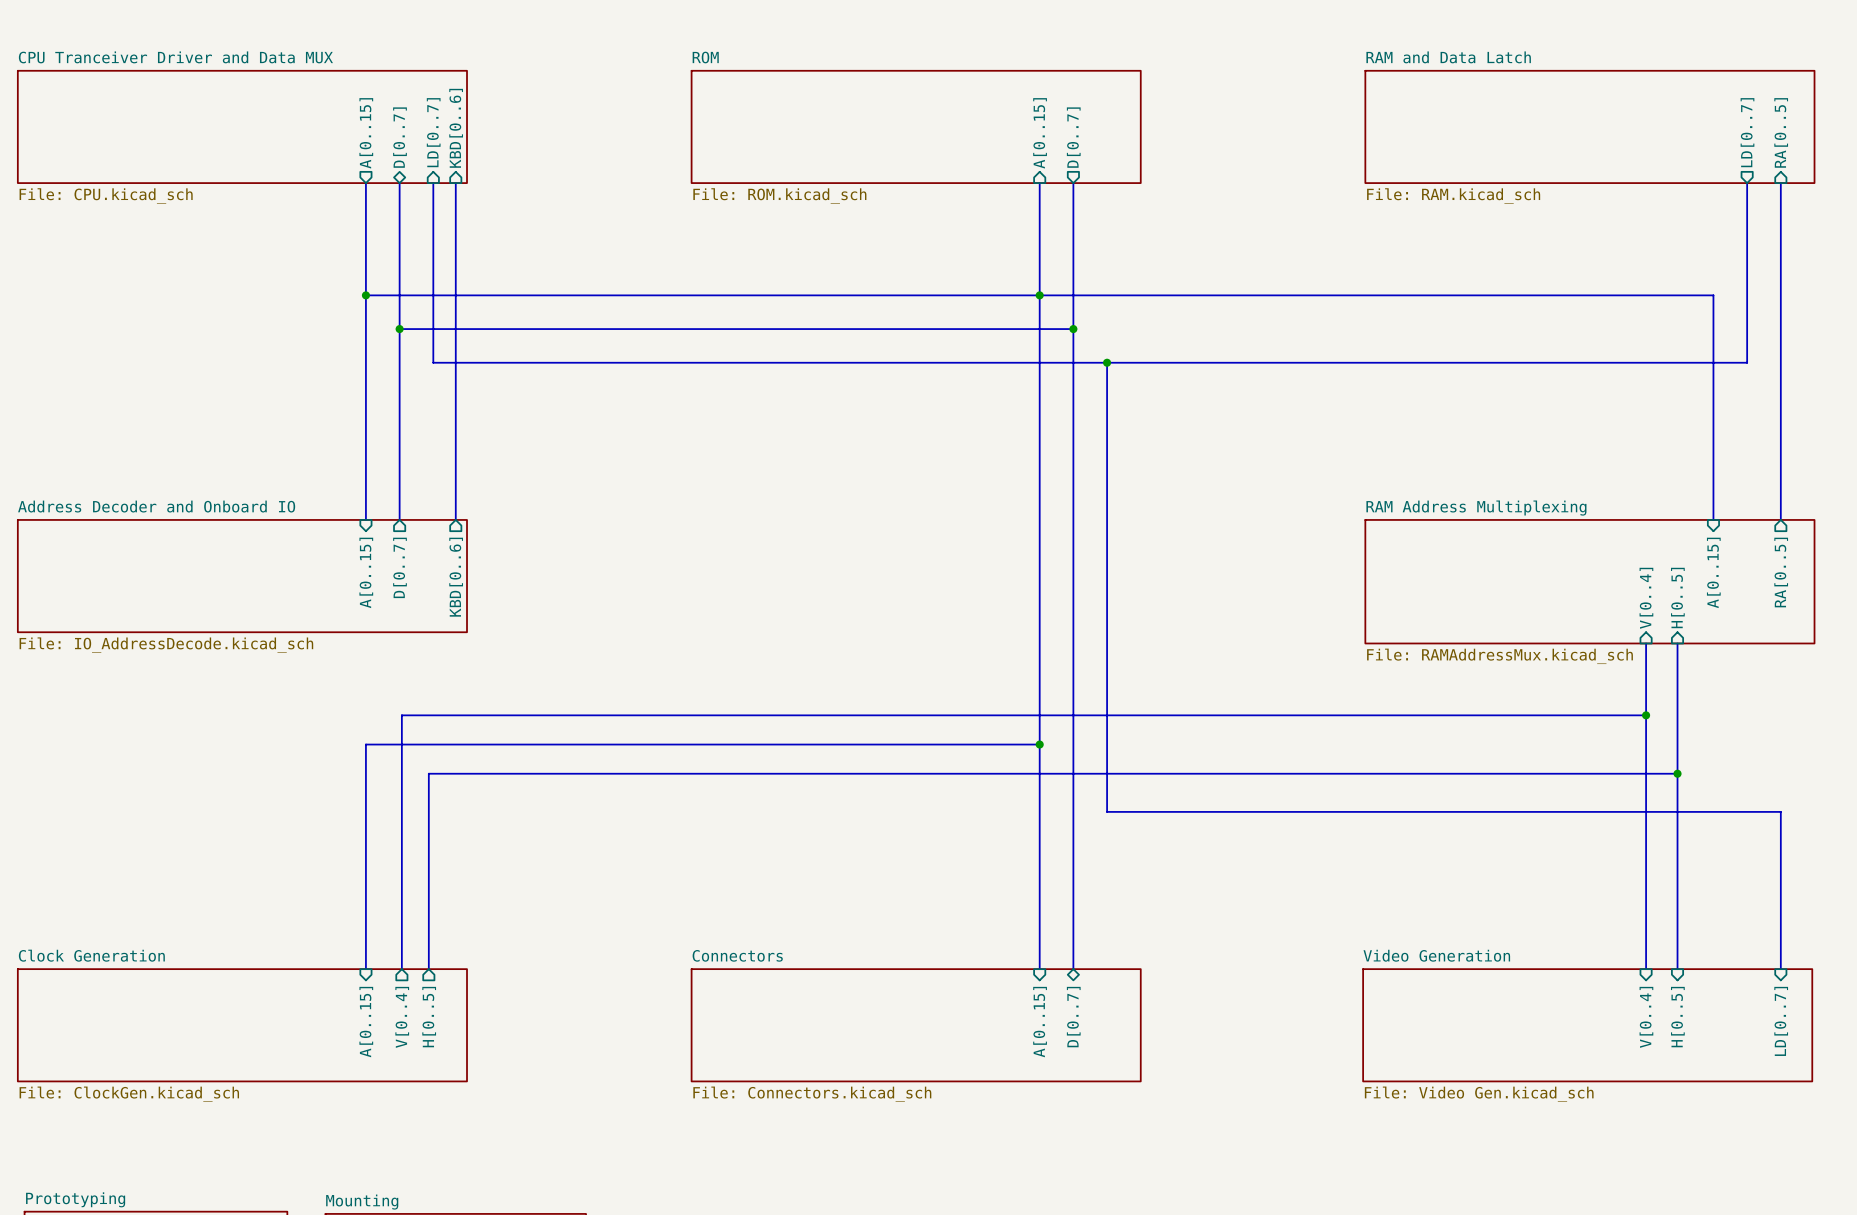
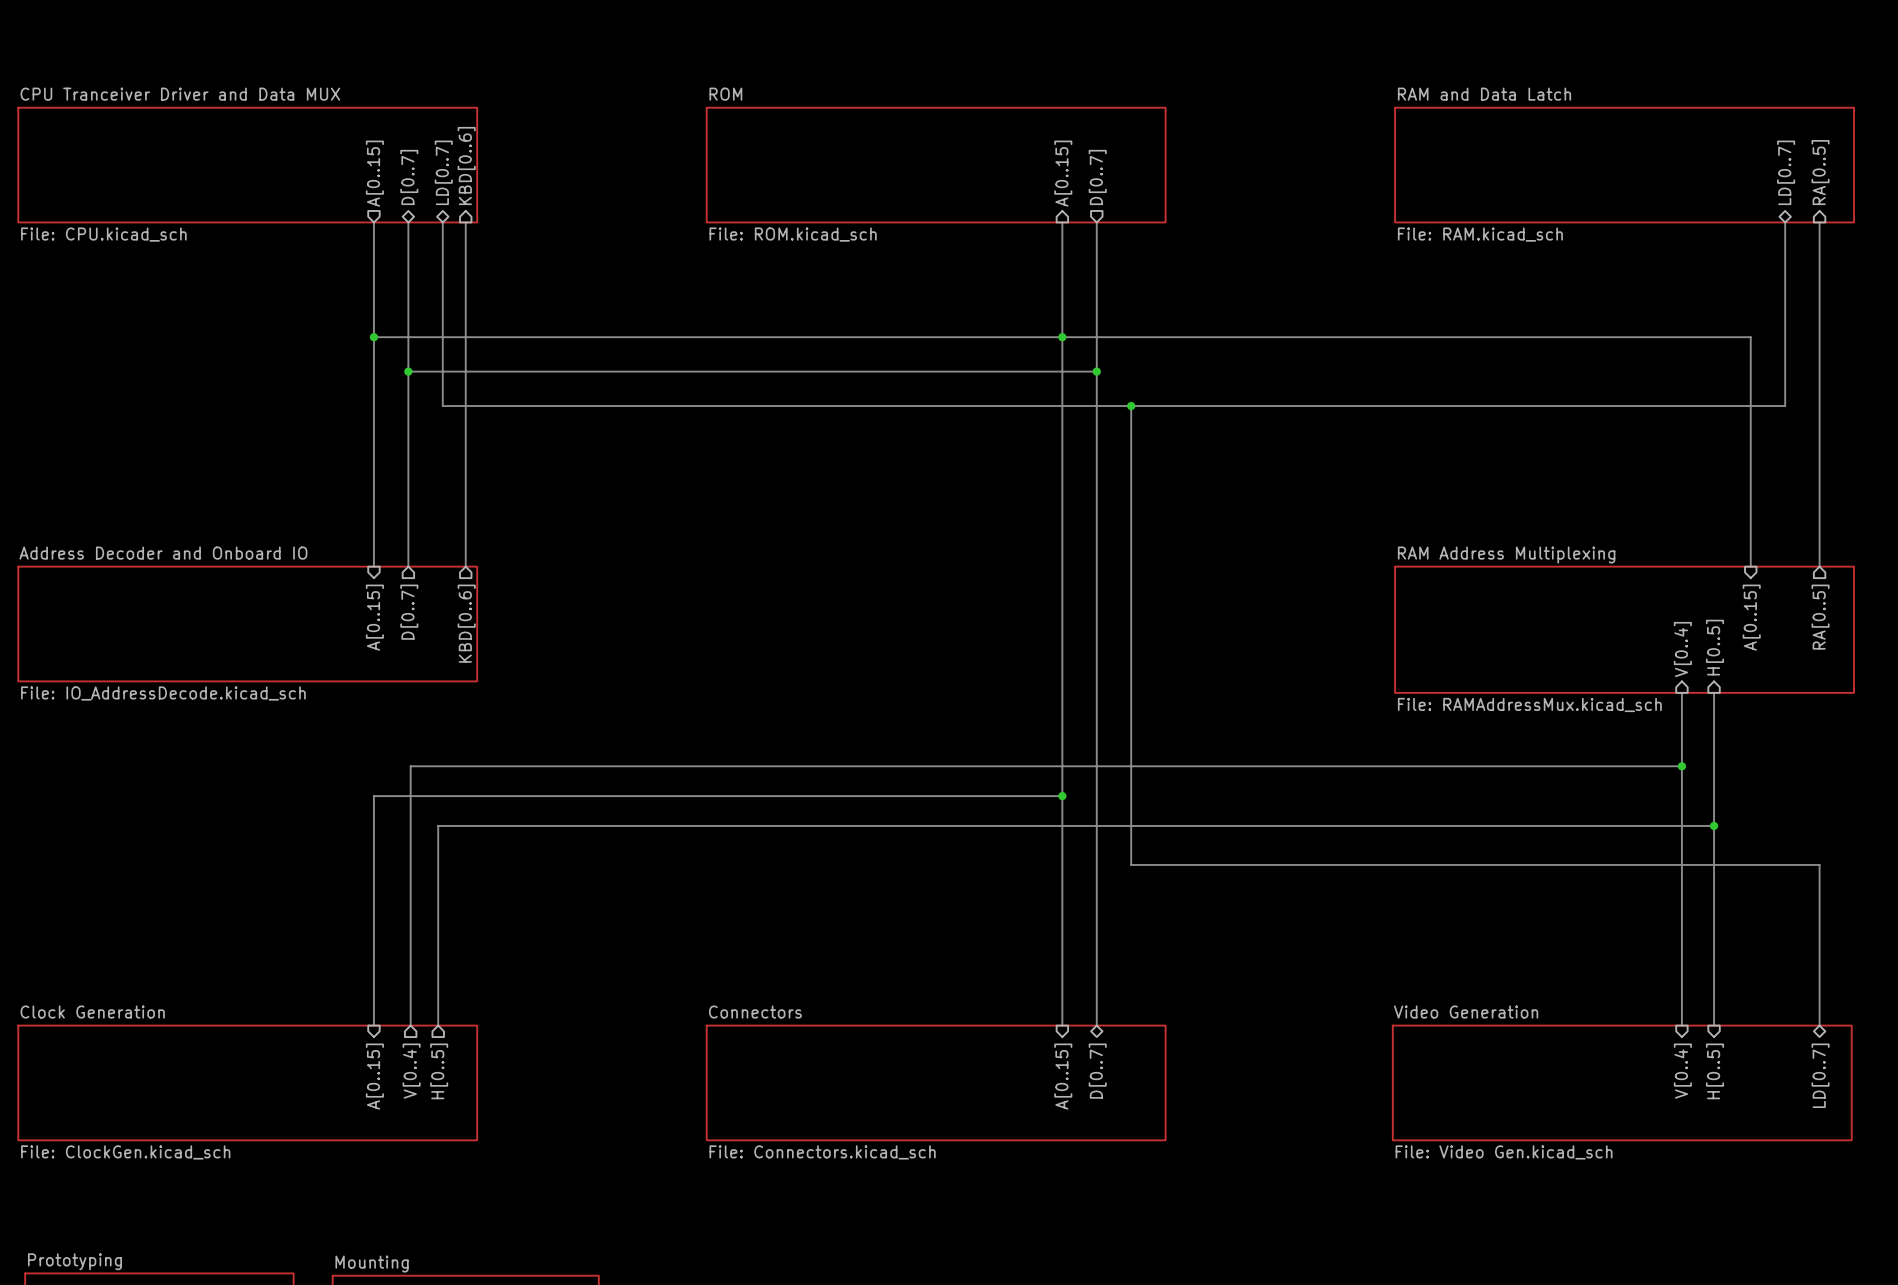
sheet pin shape: input (433, 132) -> bidirectional (443, 172)
sheet pin shape: output (1747, 132) -> bidirectional (1786, 172)
sheet pin shape: input (1781, 1021) -> bidirectional (1820, 1075)

